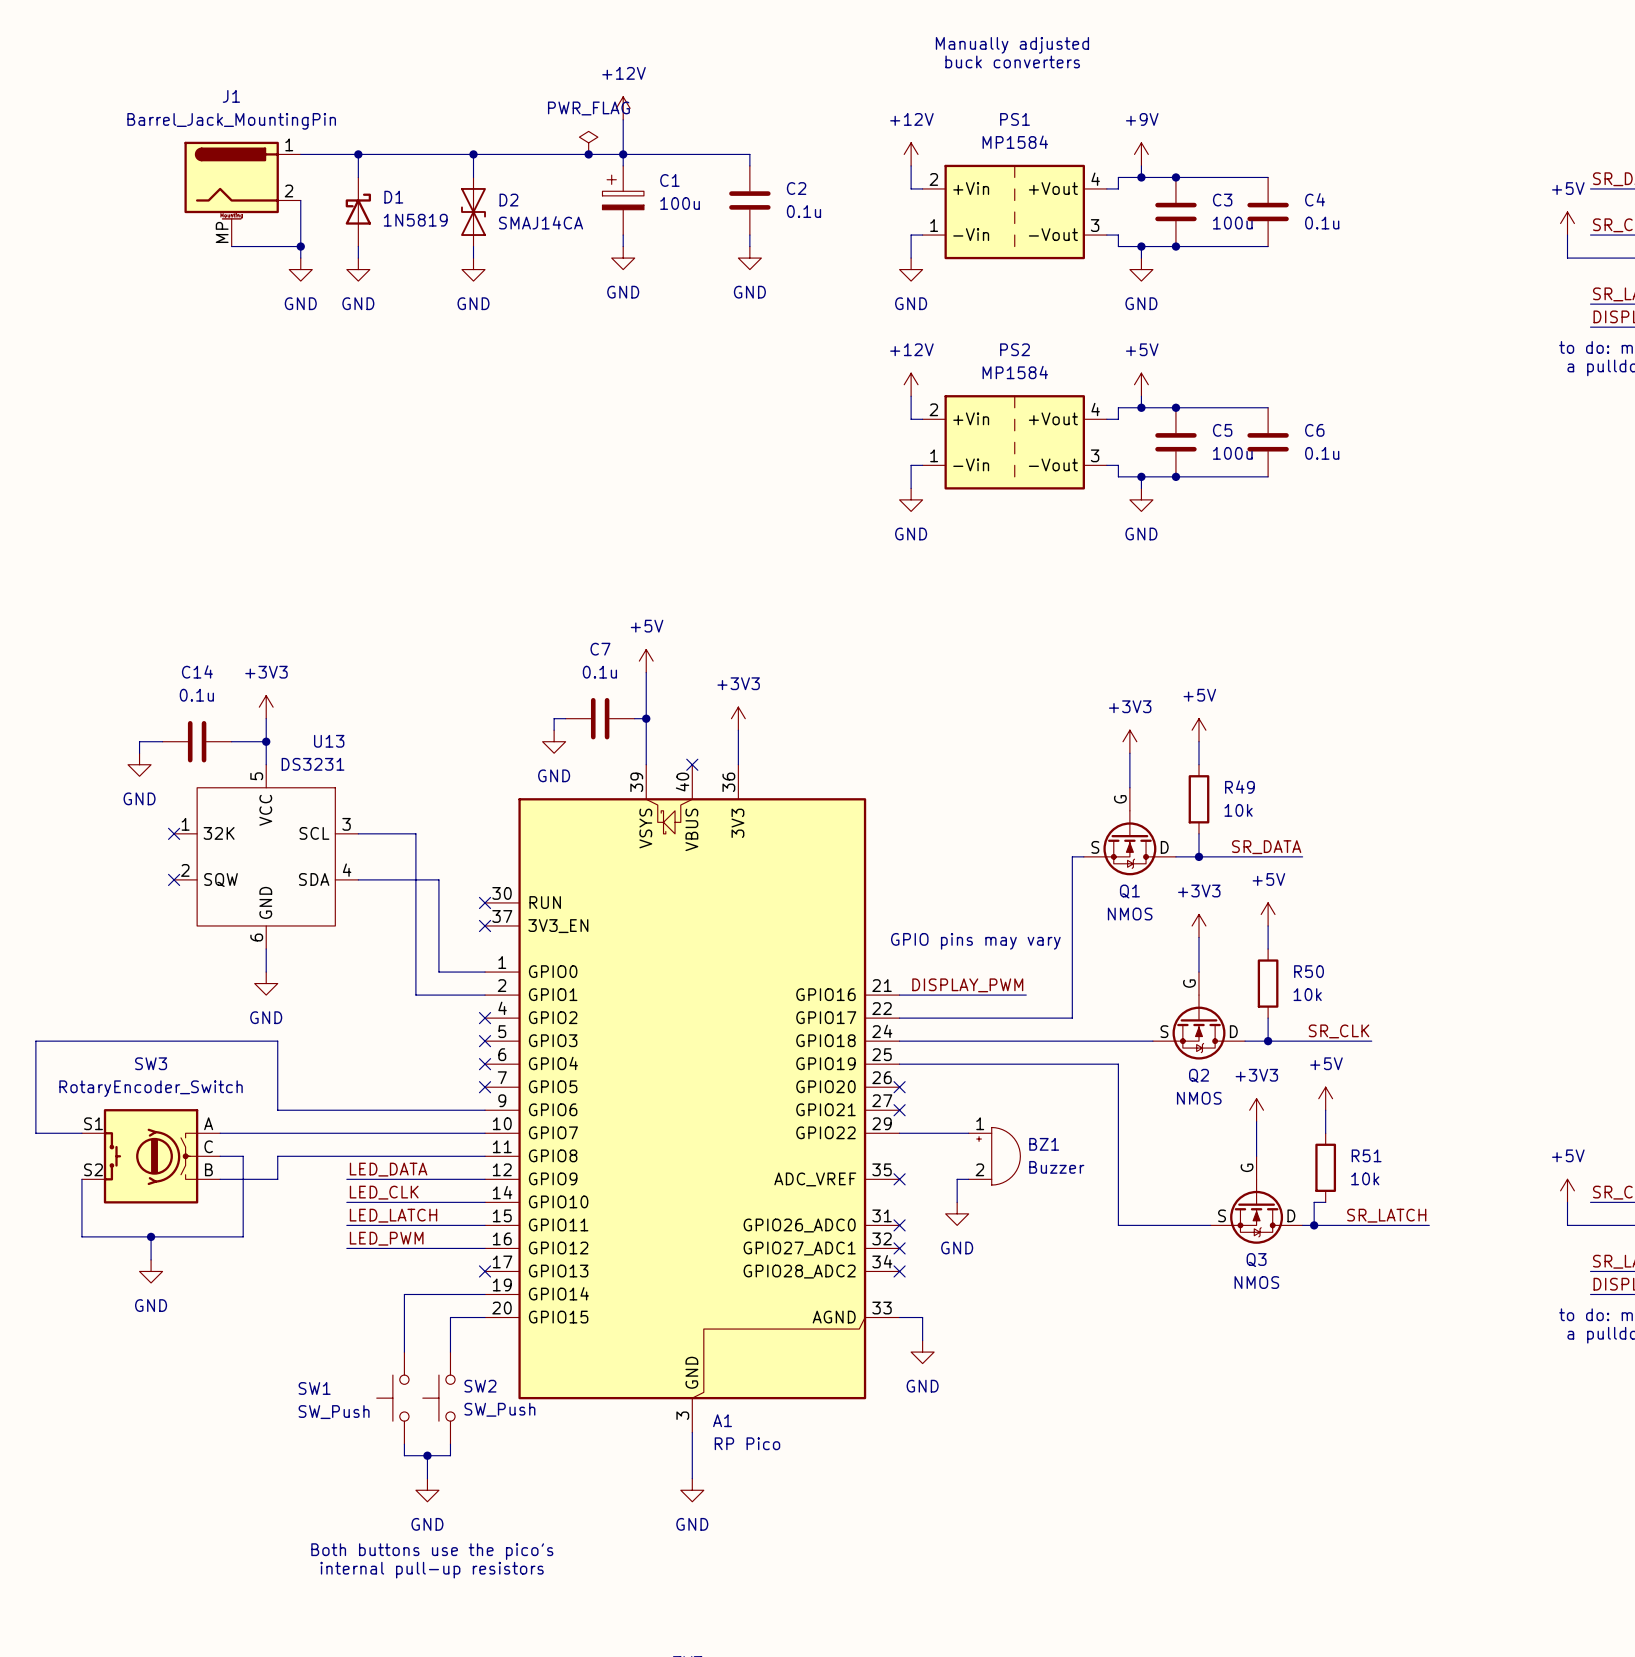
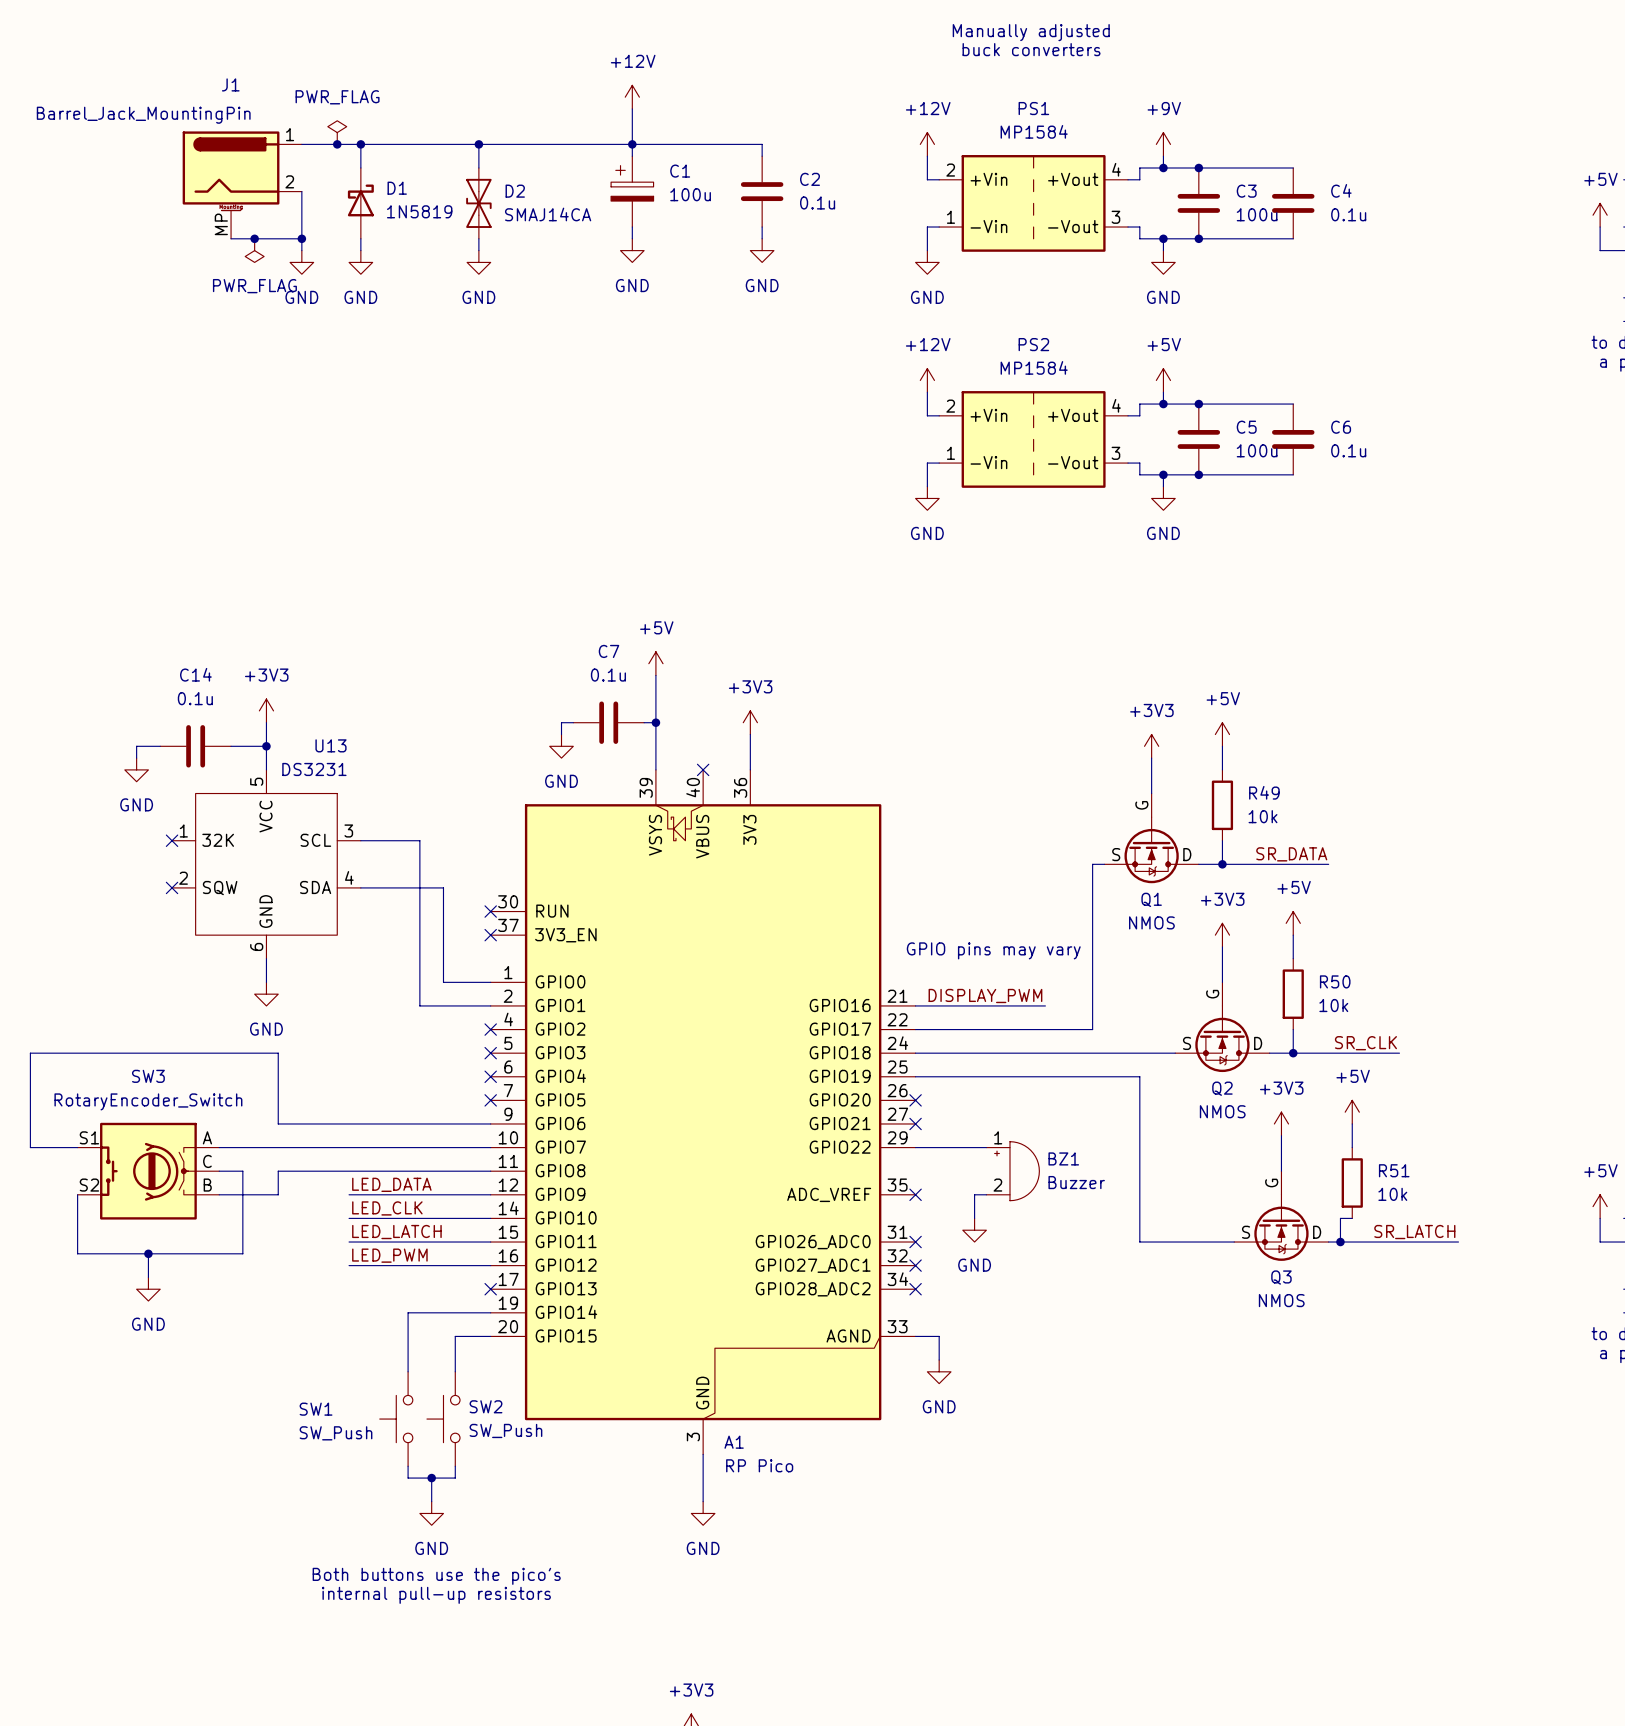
J1 value position: Barrel_Jack_MountingPin (231, 121) -> Barrel_Jack_MountingPin (143, 115)
power symbol: none -> PWR_FLAG (337, 132)
power symbol: PWR_FLAG (588, 142) -> none
junction: none -> (337, 144)
junction: (588, 154) -> none
junction: none -> (254, 238)
power symbol: none -> PWR_FLAG (254, 250)

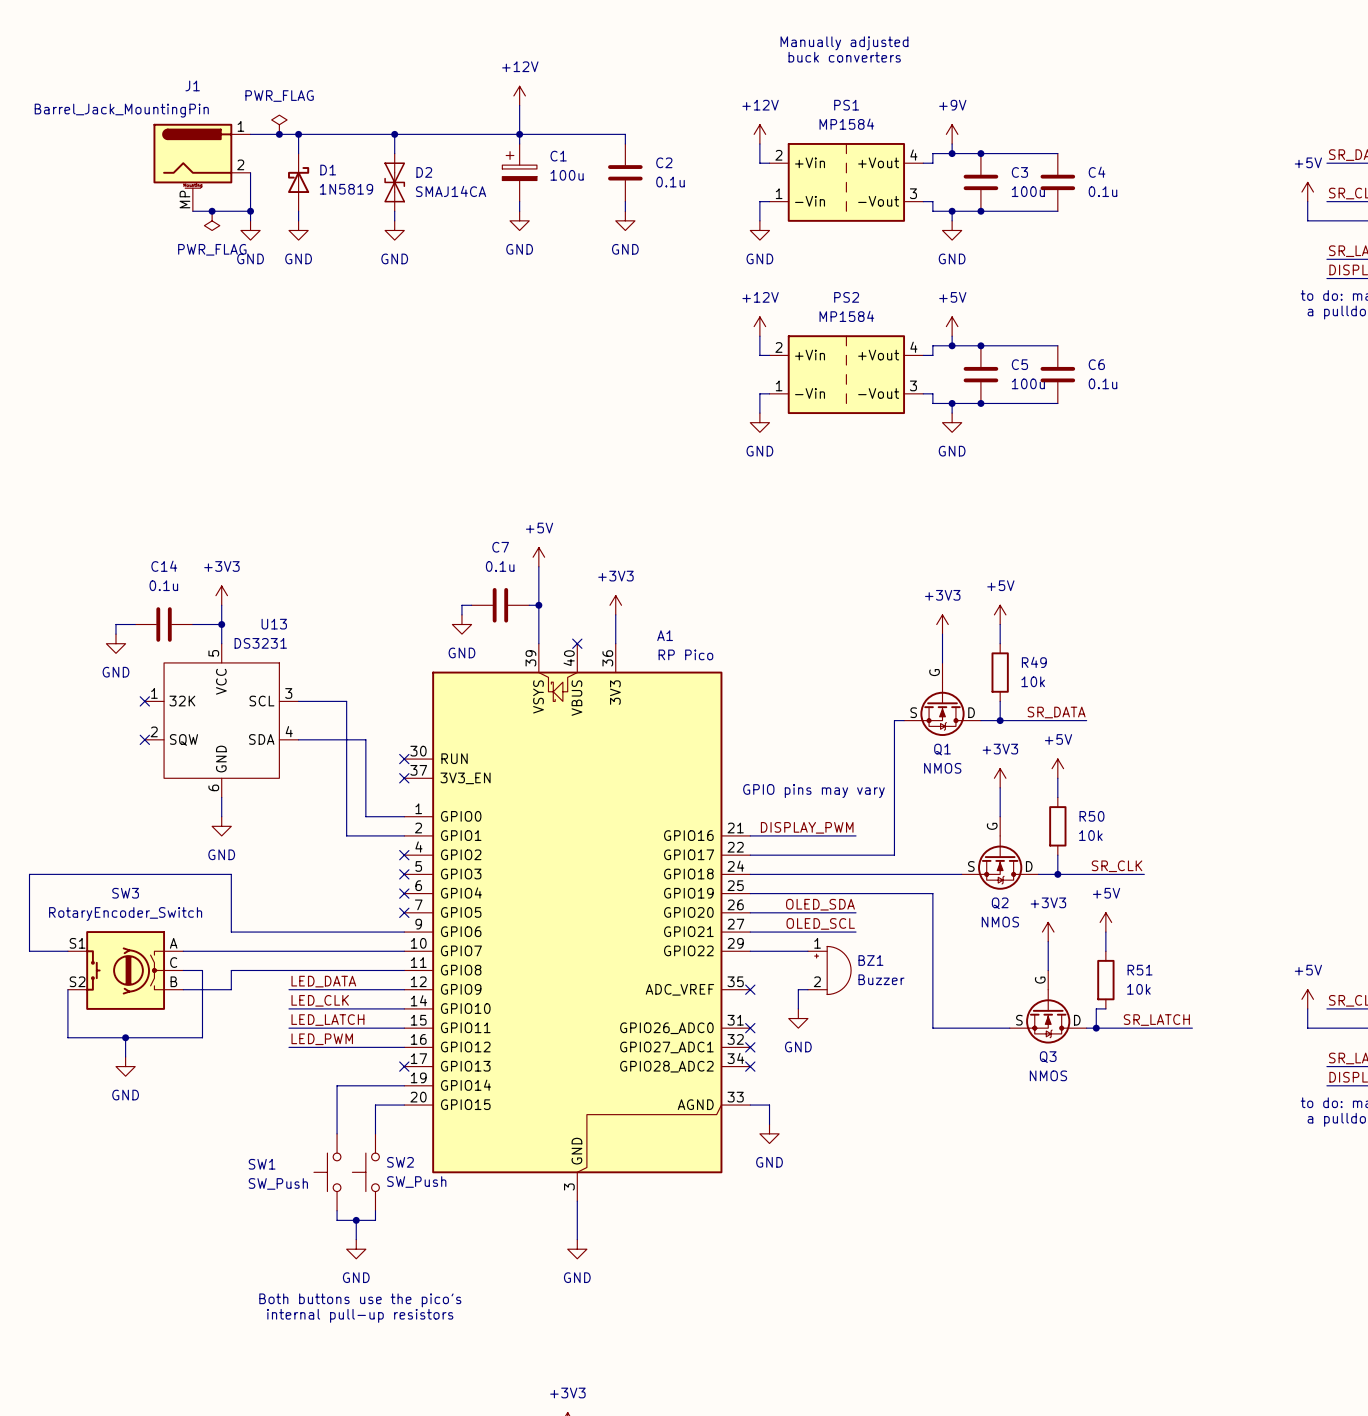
label: none -> OLED_SDA (820, 904)
wire: none -> (750, 912) (856, 912)
no-connect mark: (915, 1100) -> none
label: none -> OLED_SCL (820, 923)
wire: none -> (750, 932) (856, 932)
no-connect mark: (915, 1123) -> none
A1 name position: A1 (734, 1442) -> A1 (665, 635)
A1 value position: RP Pico (759, 1465) -> RP Pico (685, 654)

